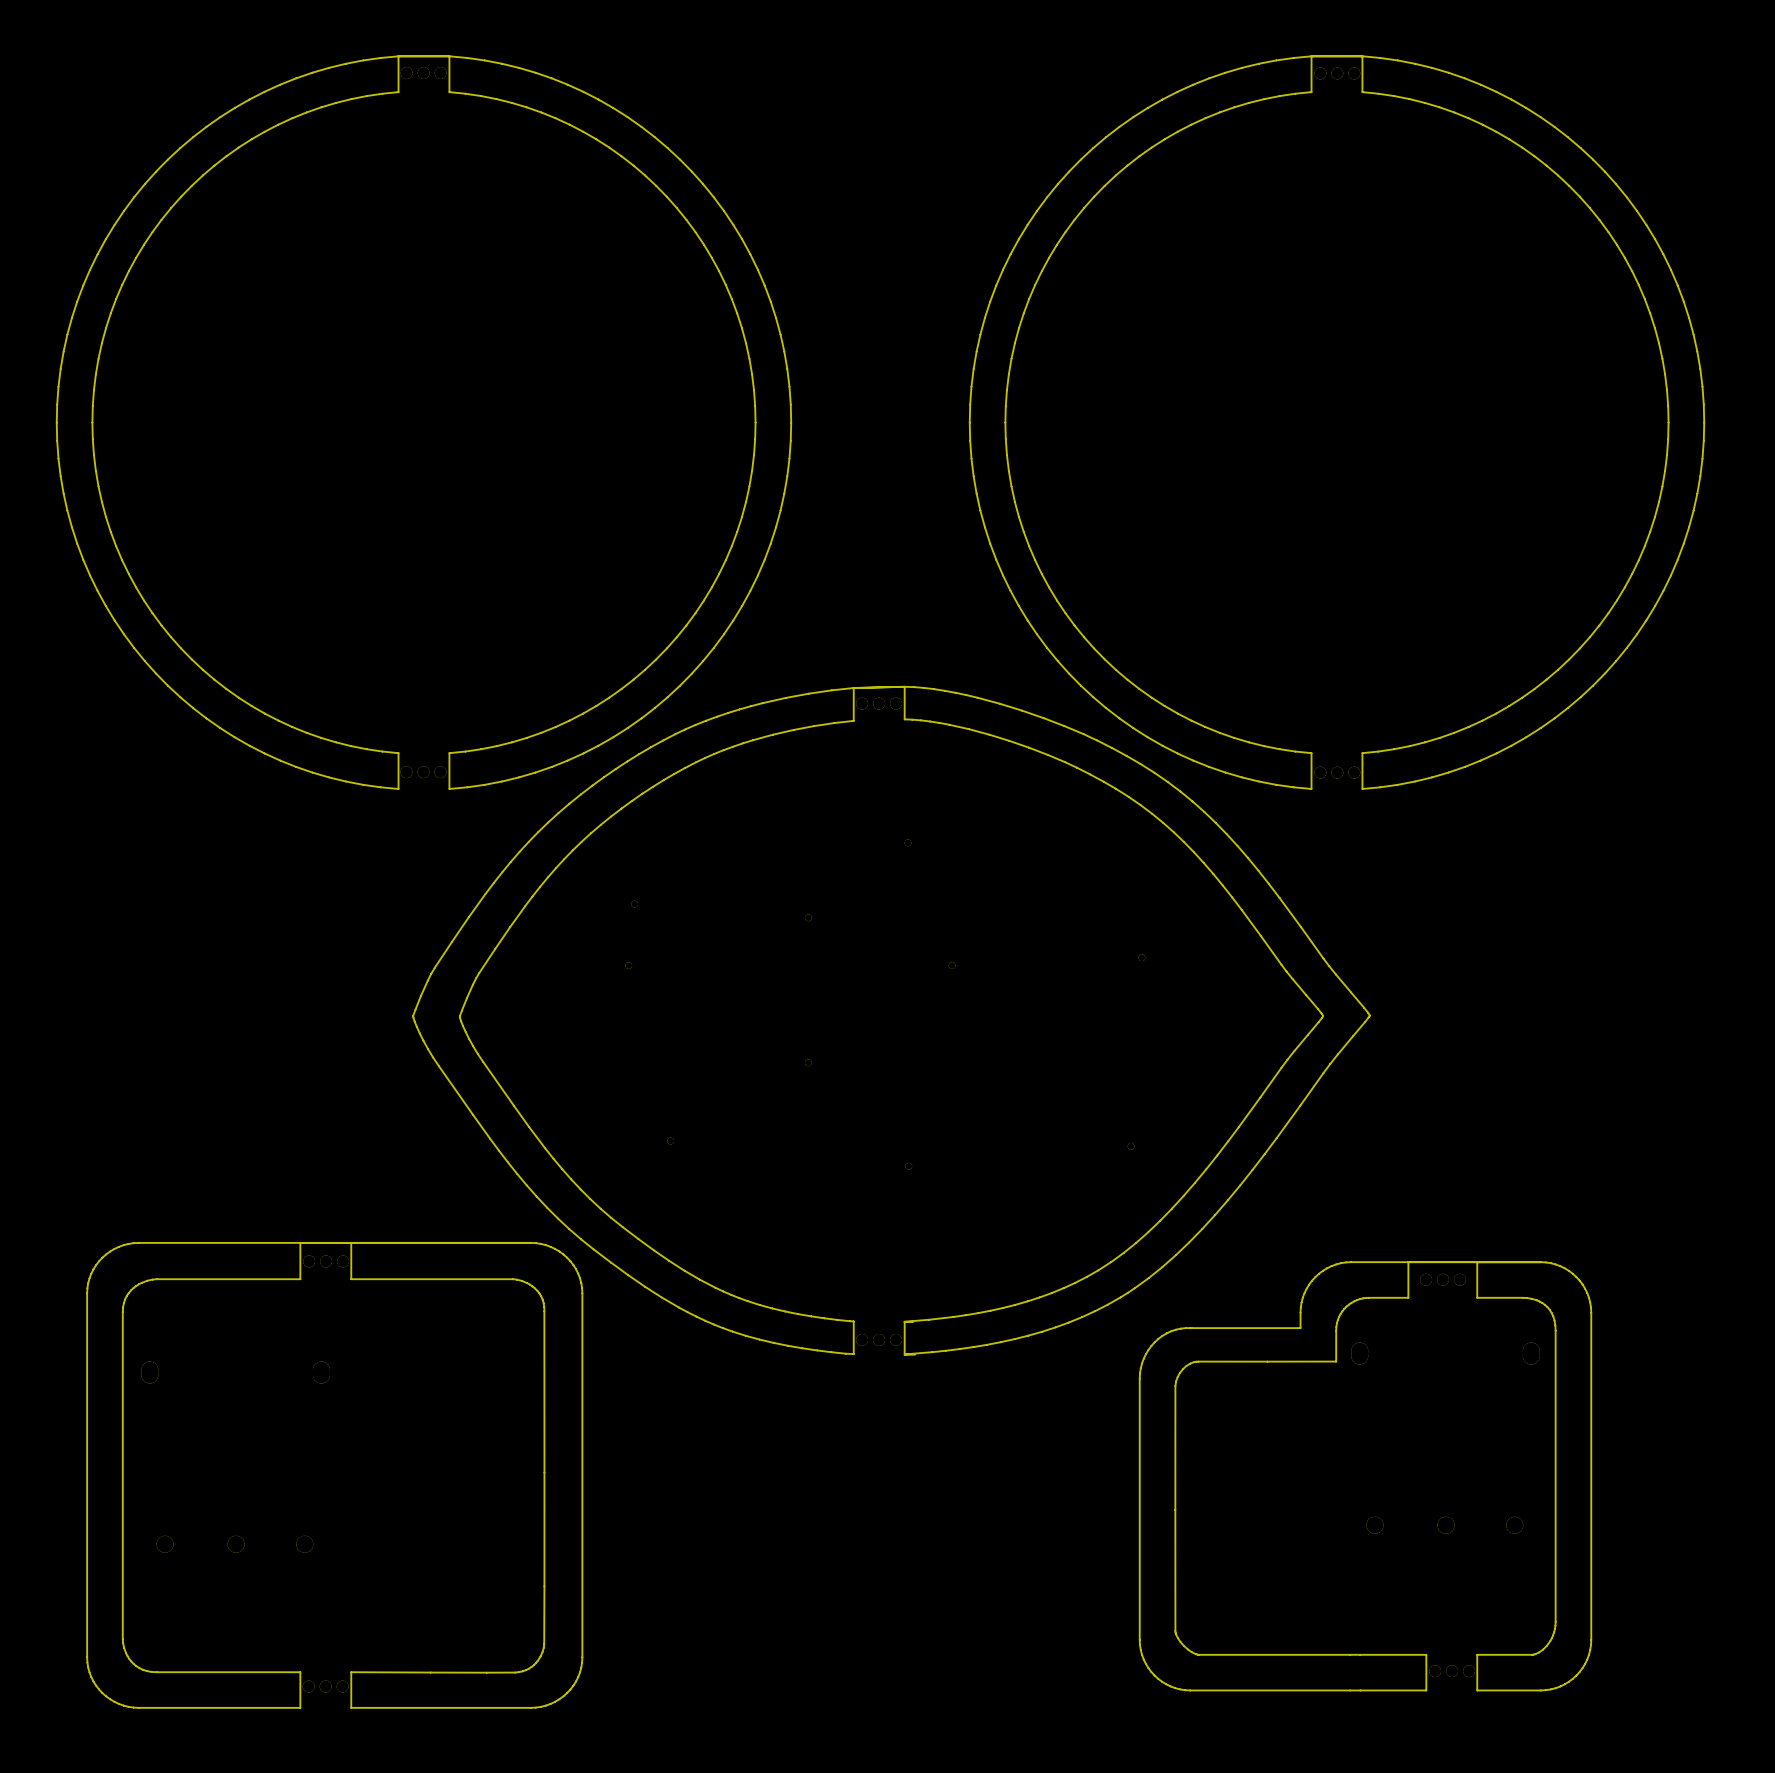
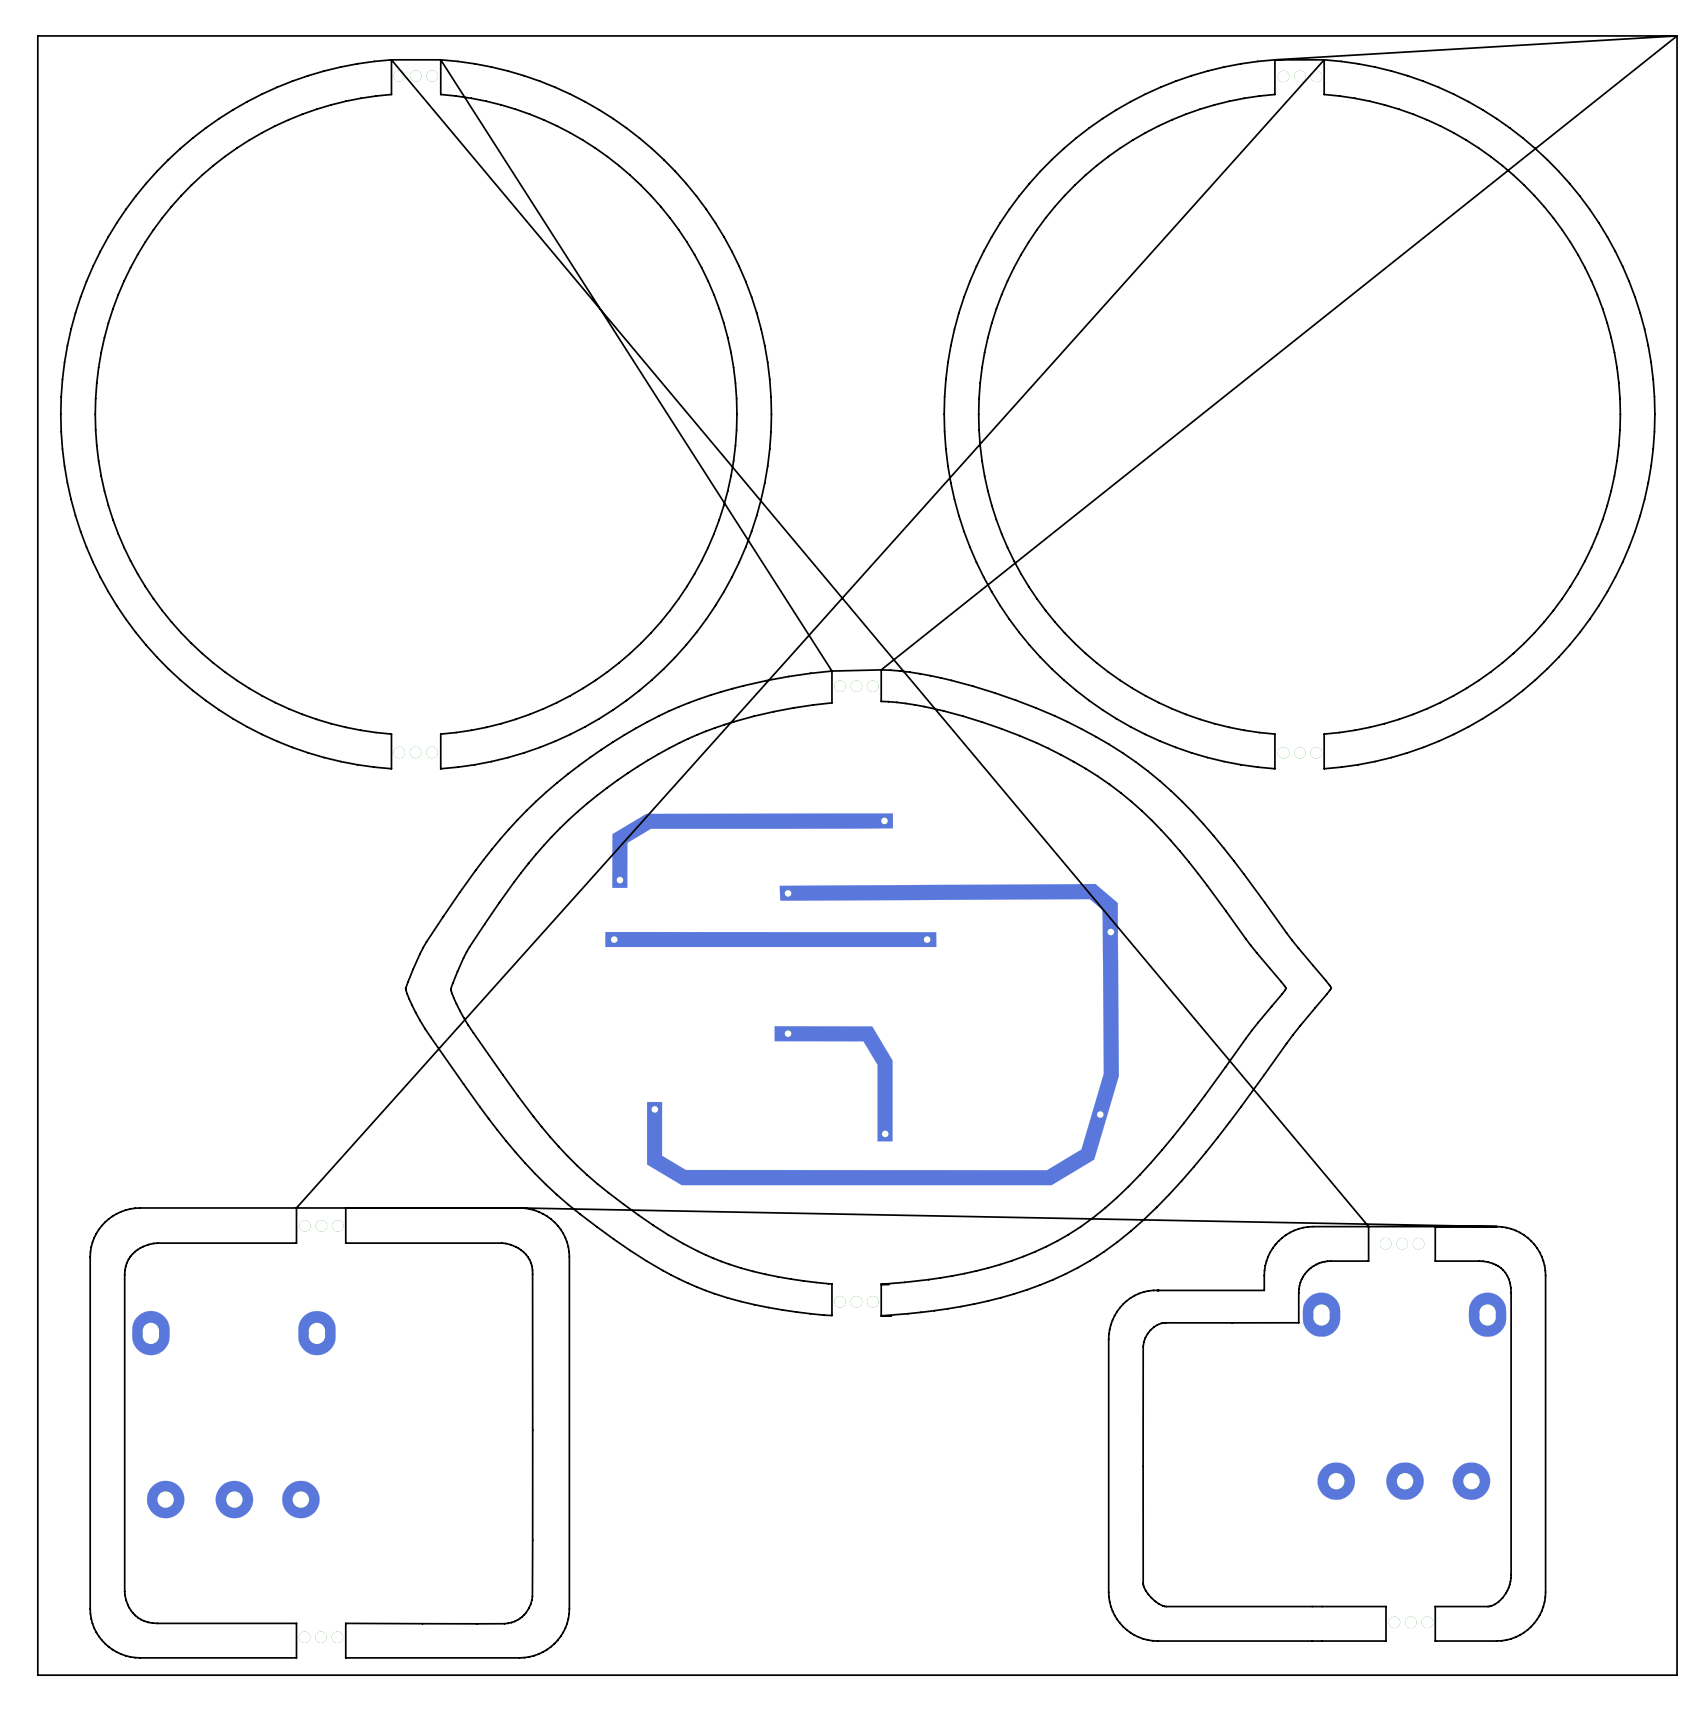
board edge: none -> (1677, 35) (37, 35) (37, 1675) (1677, 1675) (1677, 35)
board edge: none -> (1677, 35) (881, 669)
board edge: none -> (1677, 35) (1274, 59)
board edge: none -> (391, 59) (1368, 1226)
board edge: none -> (440, 59) (831, 671)
board edge: none -> (1324, 59) (296, 1207)
drawing: none -> [132, 813, 1507, 1519]
board edge: none -> (519, 1207) (1496, 1226)

